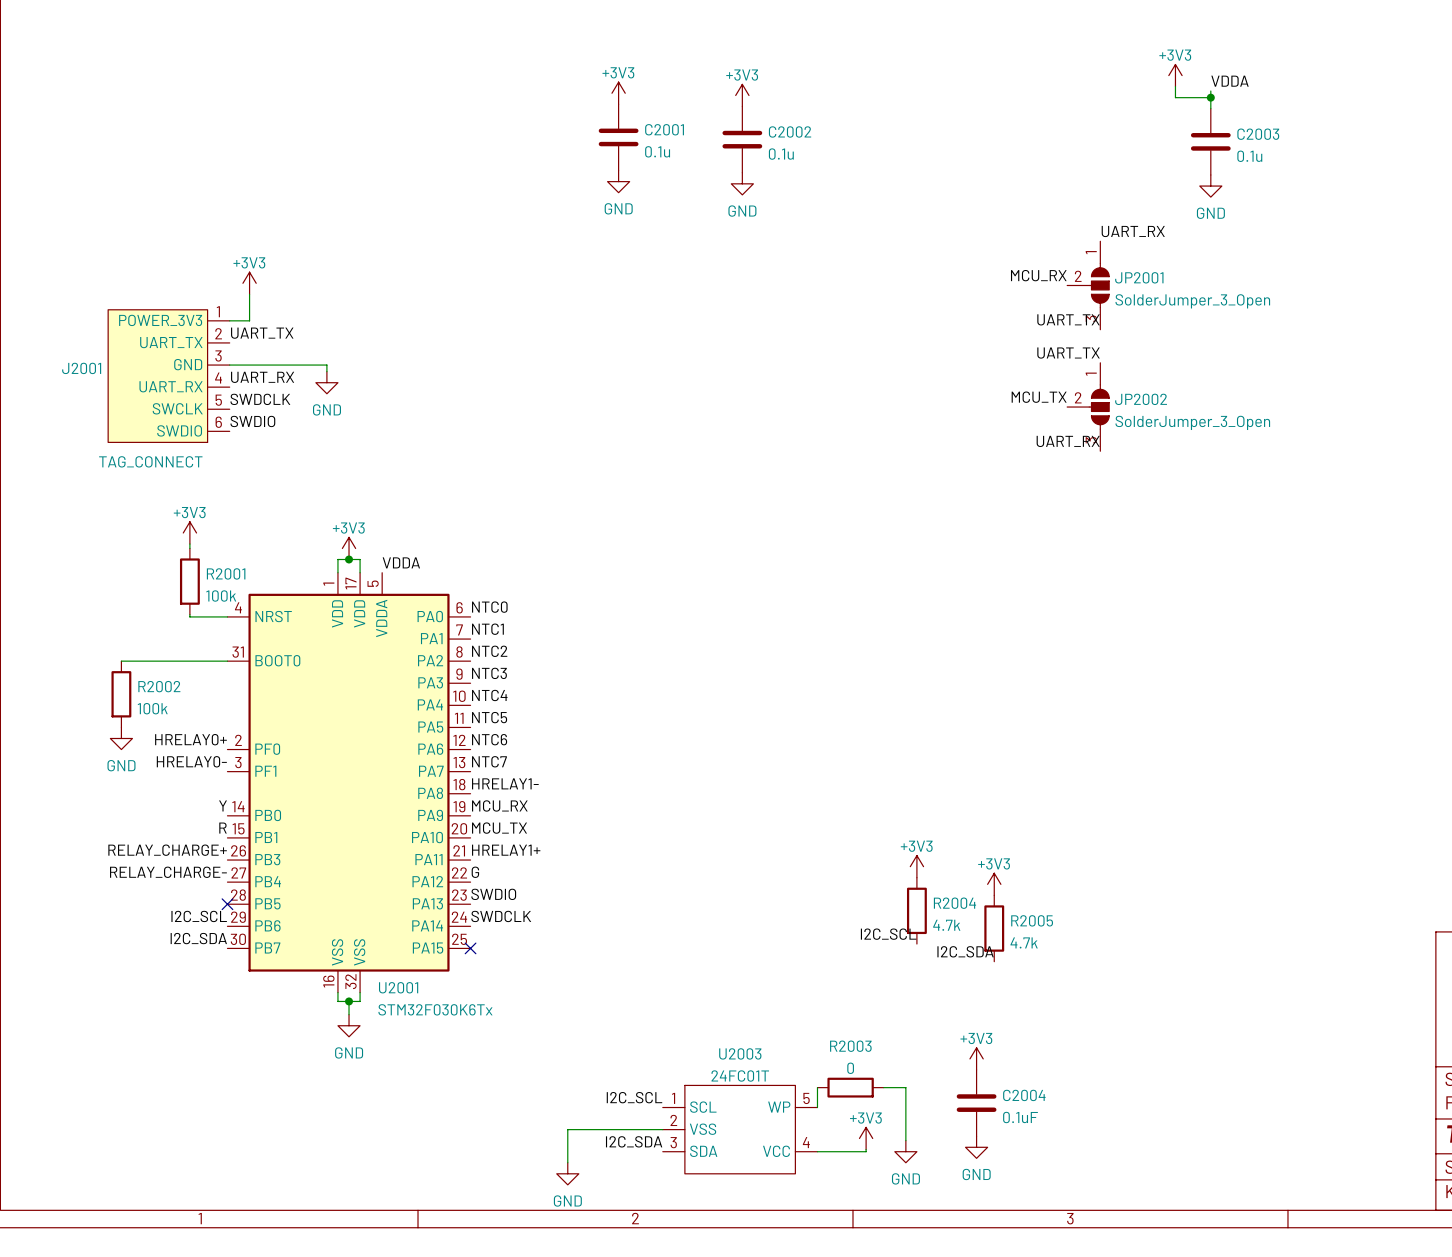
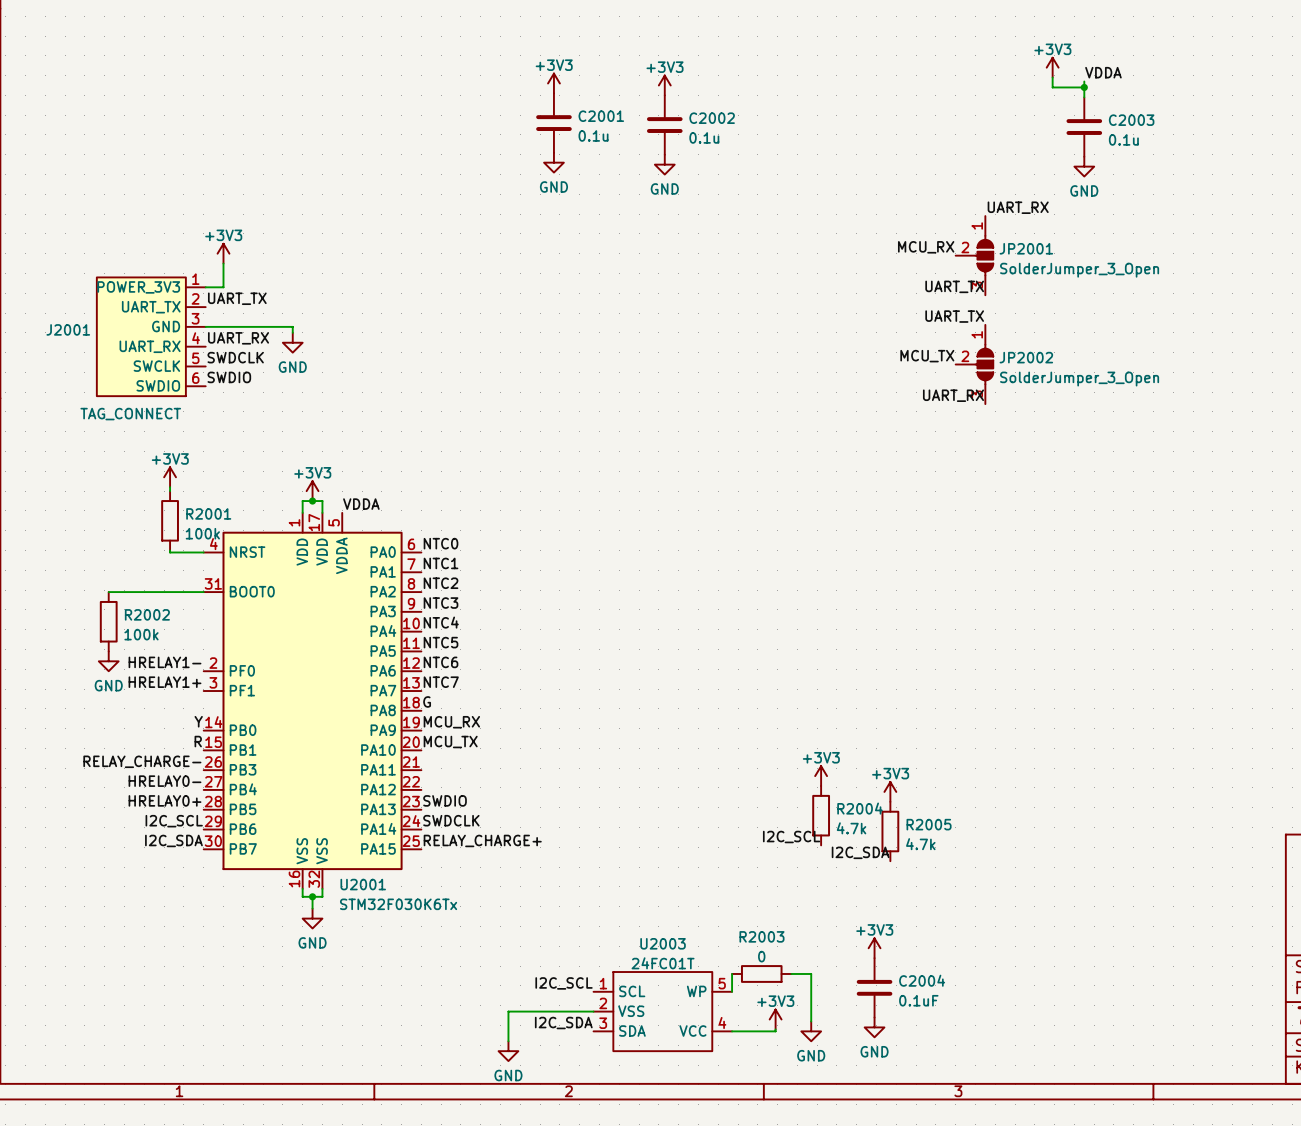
label: HRELAY0+ (190, 739) -> HRELAY1- (165, 662)
label: HRELAY0- (191, 761) -> HRELAY1+ (165, 682)
label: HRELAY1- (505, 783) -> G (427, 701)
label: RELAY_CHARGE+ (167, 850) -> RELAY_CHARGE- (142, 761)
label: HRELAY1+ (506, 850) -> none
label: RELAY_CHARGE- (168, 872) -> HRELAY0- (165, 781)
label: G (475, 872) -> none
label: none -> HRELAY0+ (165, 800)
no-connect mark: (227, 904) -> none
label: none -> RELAY_CHARGE+ (482, 840)
no-connect mark: (470, 948) -> none

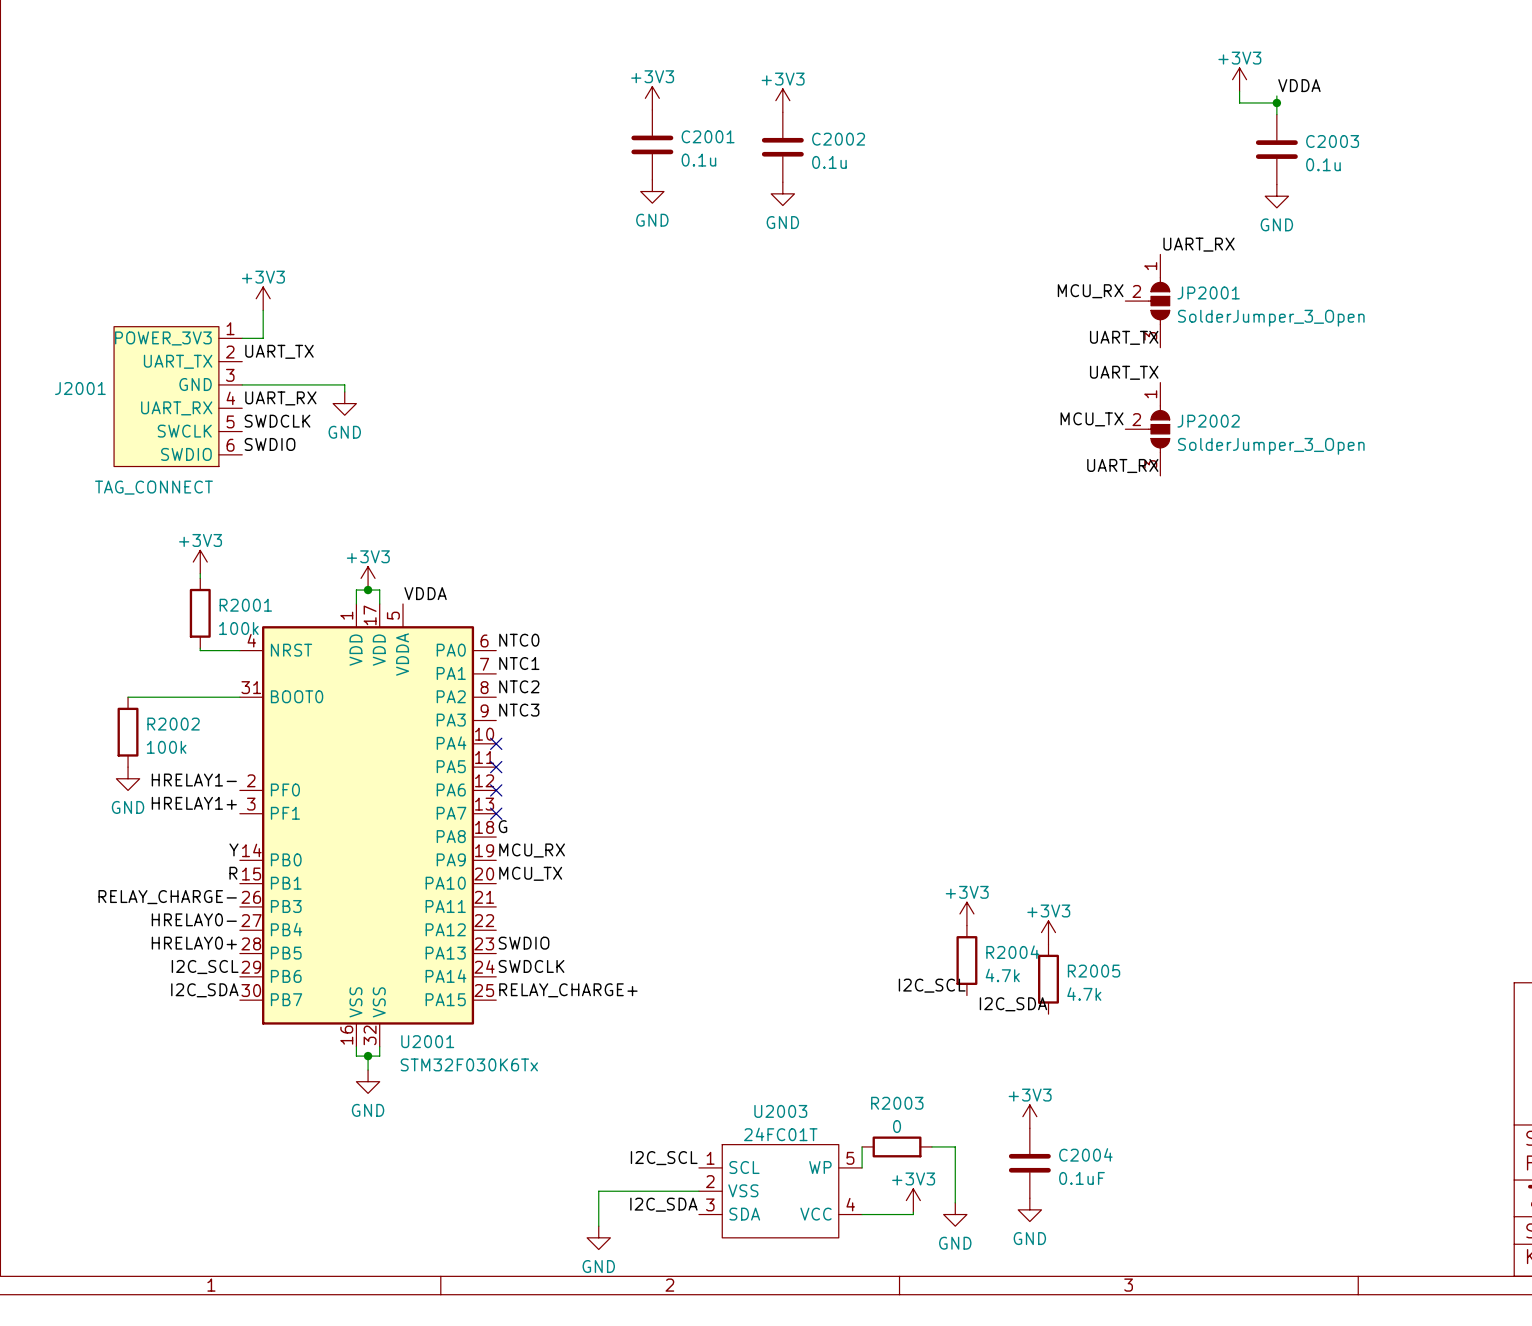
label: NTC4 (441, 622) -> none
no-connect mark: none -> (496, 743)
label: NTC5 (441, 642) -> none
no-connect mark: none -> (496, 767)
label: NTC6 (441, 662) -> none
no-connect mark: none -> (496, 790)
label: NTC7 (441, 682) -> none
no-connect mark: none -> (496, 813)

